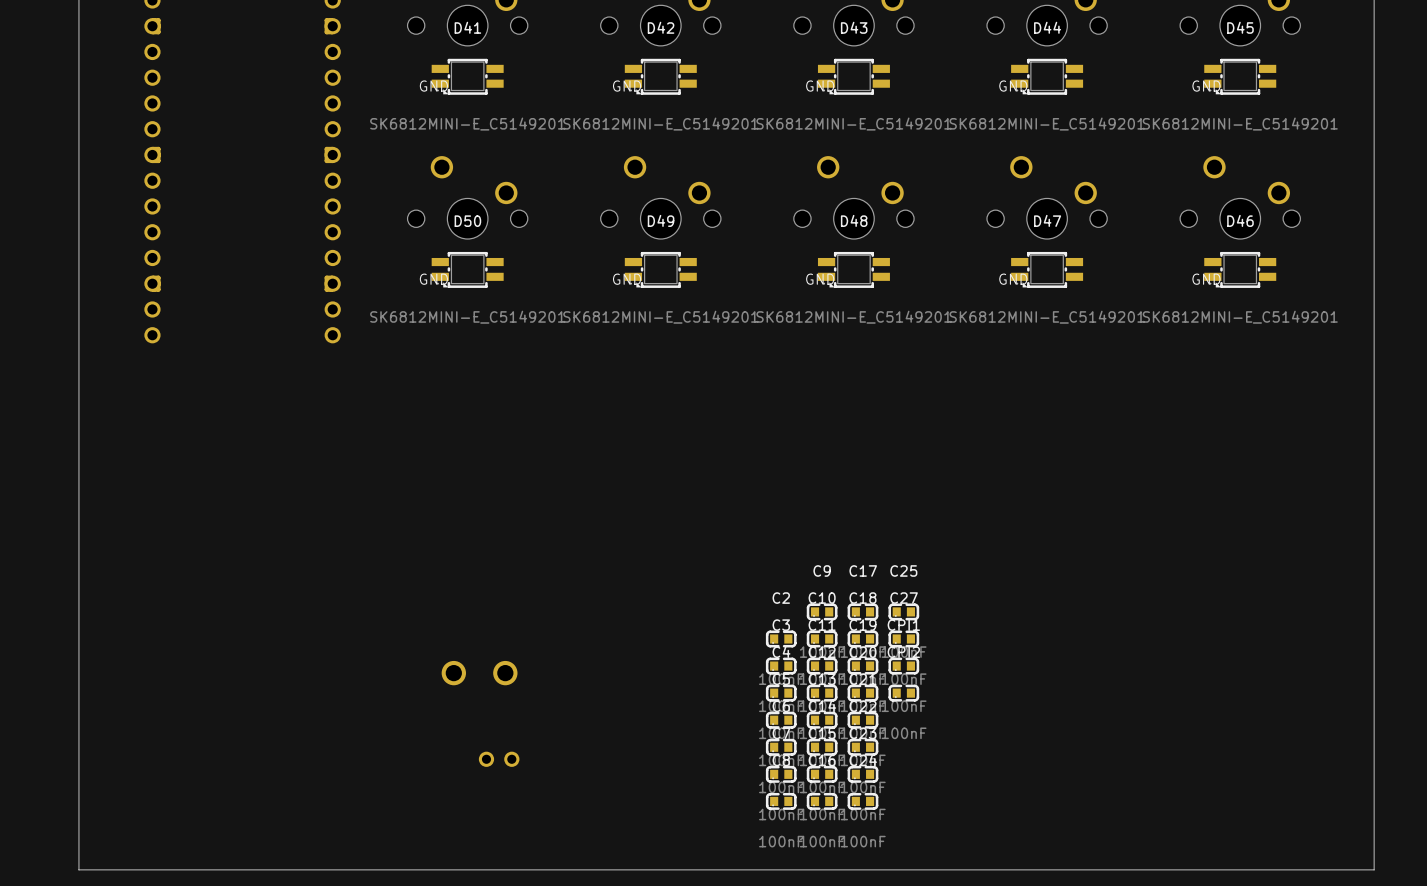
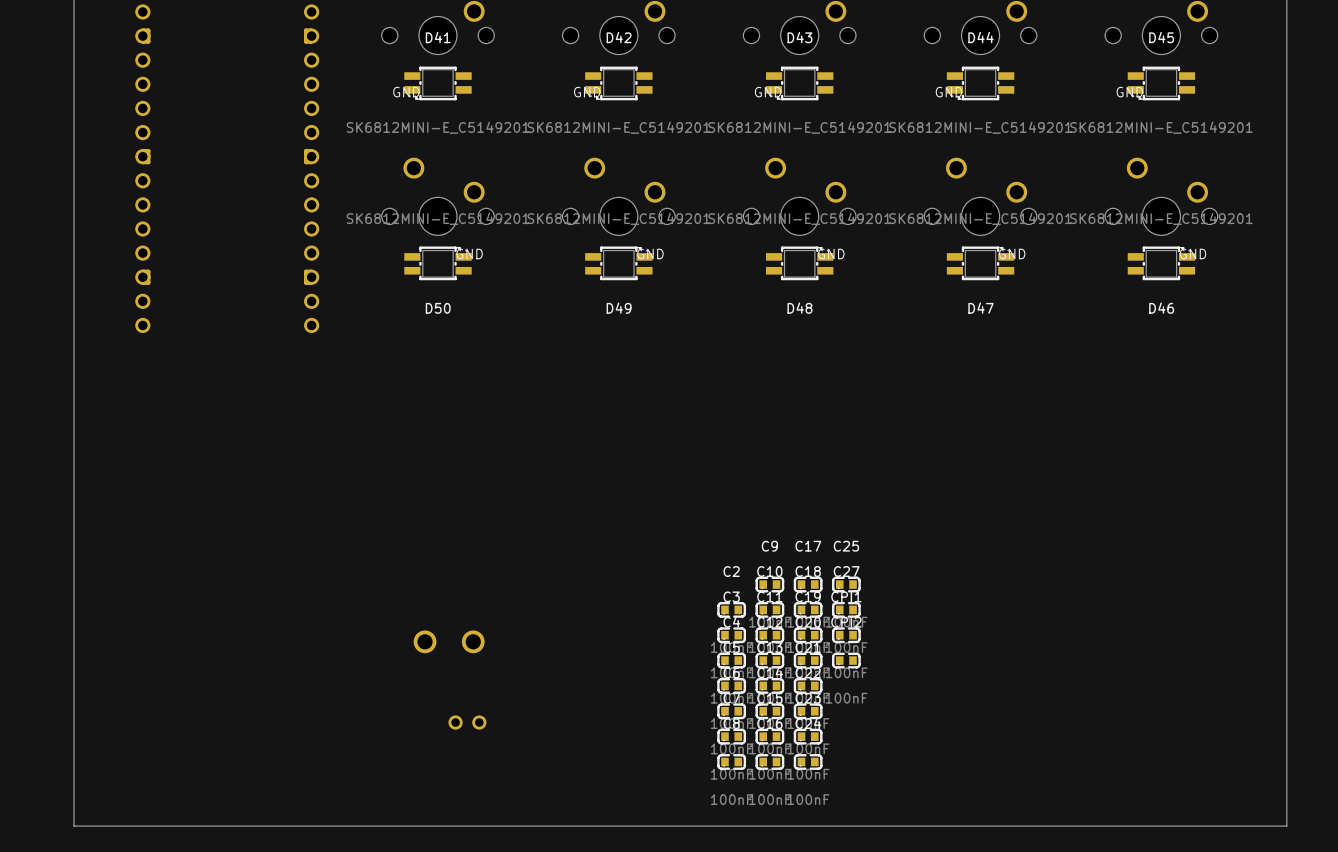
D50 rotation: 0° (467, 269) -> 180° (437, 263)
D49 rotation: 0° (660, 269) -> 180° (618, 263)
D48 rotation: 0° (853, 269) -> 180° (799, 263)
D47 rotation: 0° (1047, 269) -> 180° (980, 263)
D46 rotation: 0° (1240, 269) -> 180° (1161, 263)

